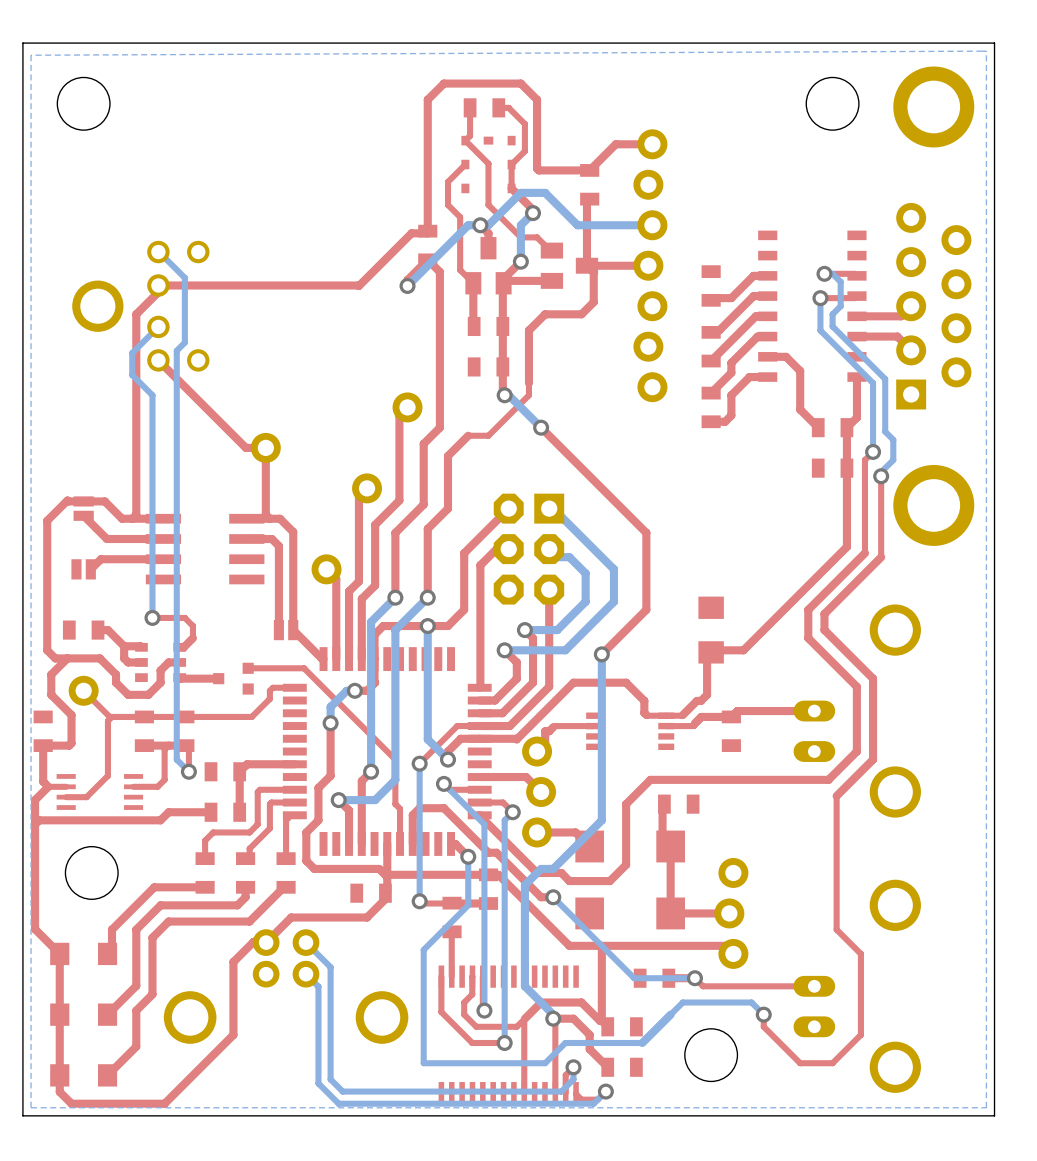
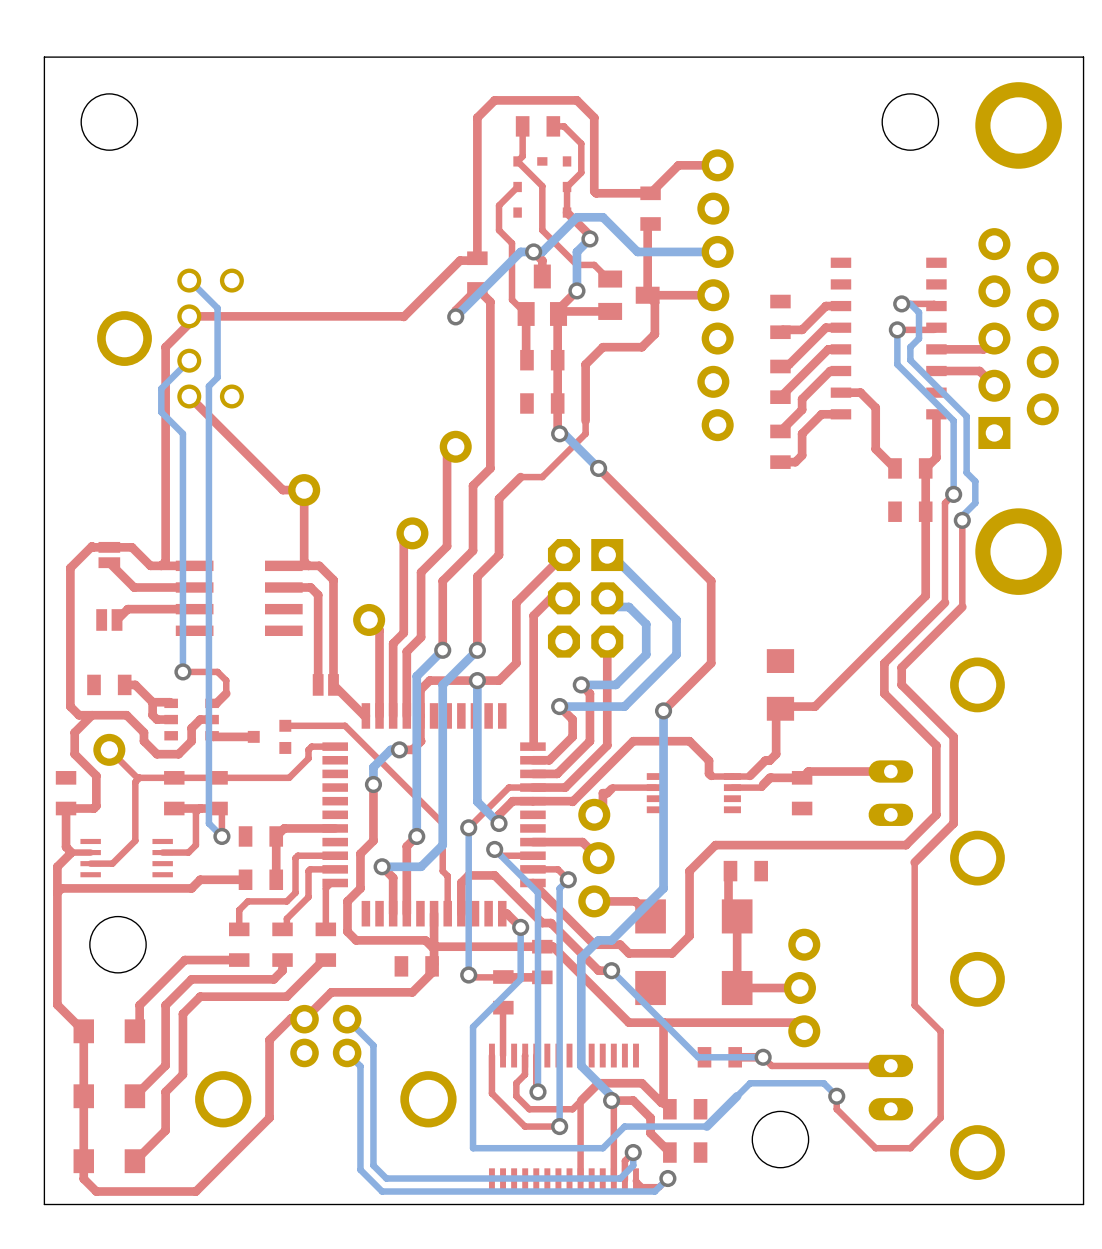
bottom zone outline: (986, 51) (986, 1107) (31, 1107) (31, 55) (986, 51) -> none

